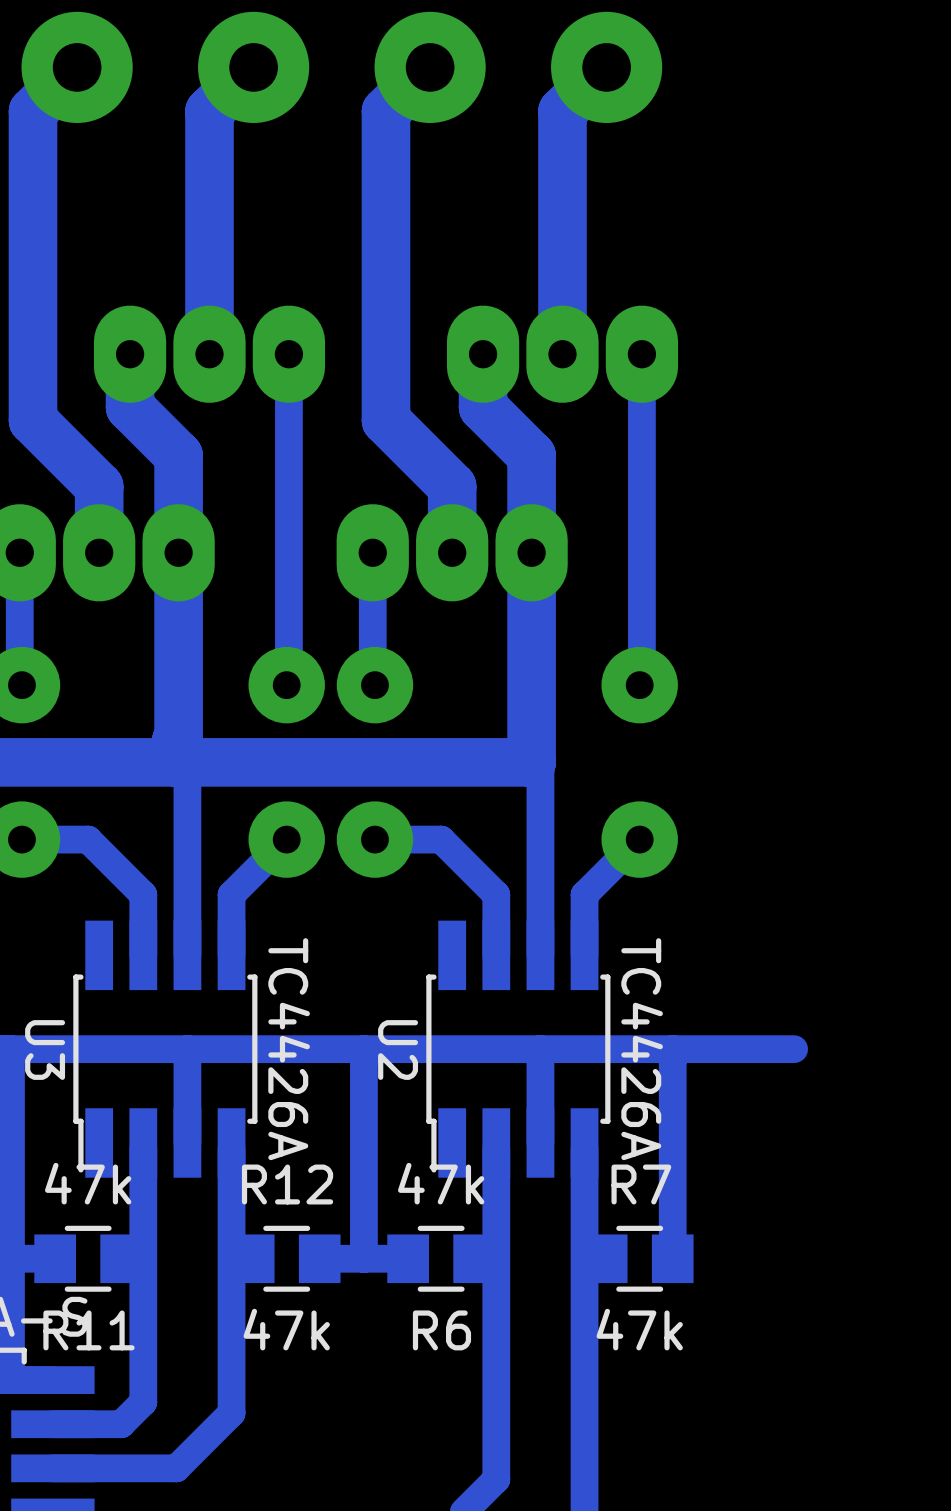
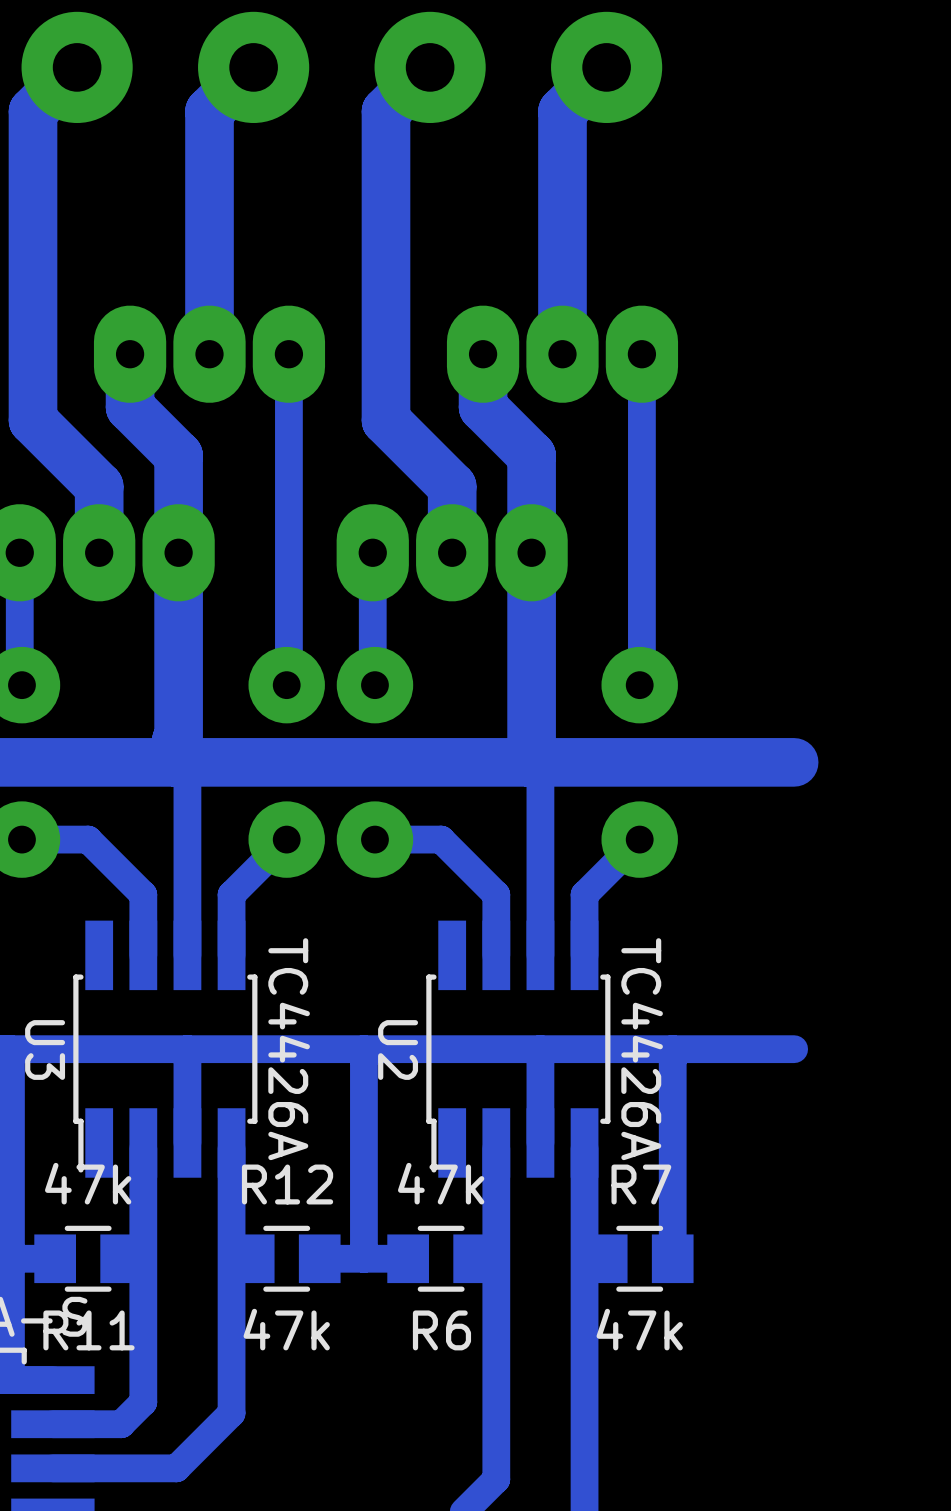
track: none -> (794, 762) (529, 762)

